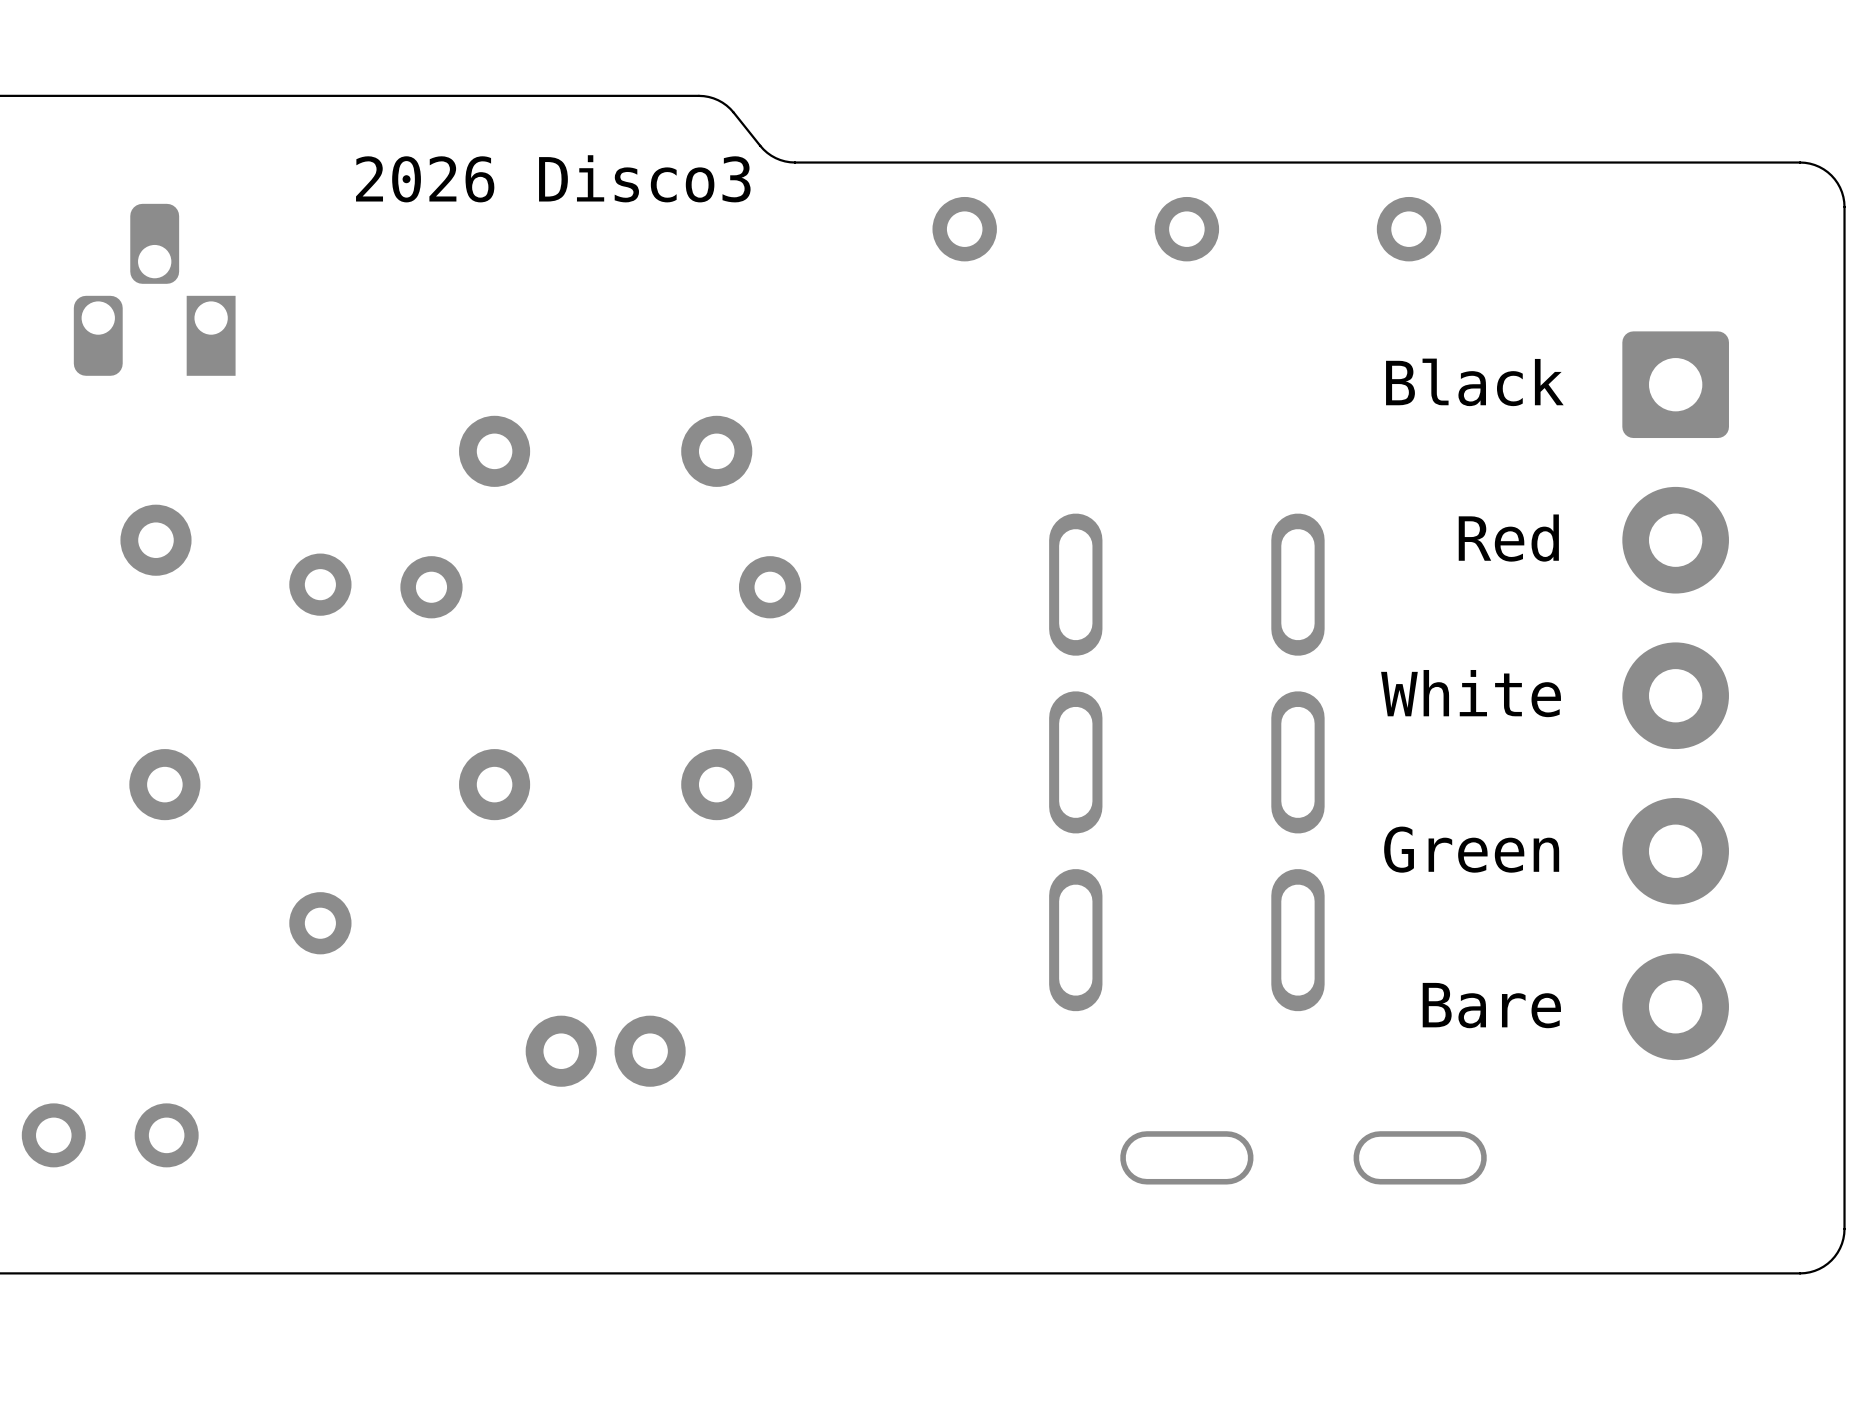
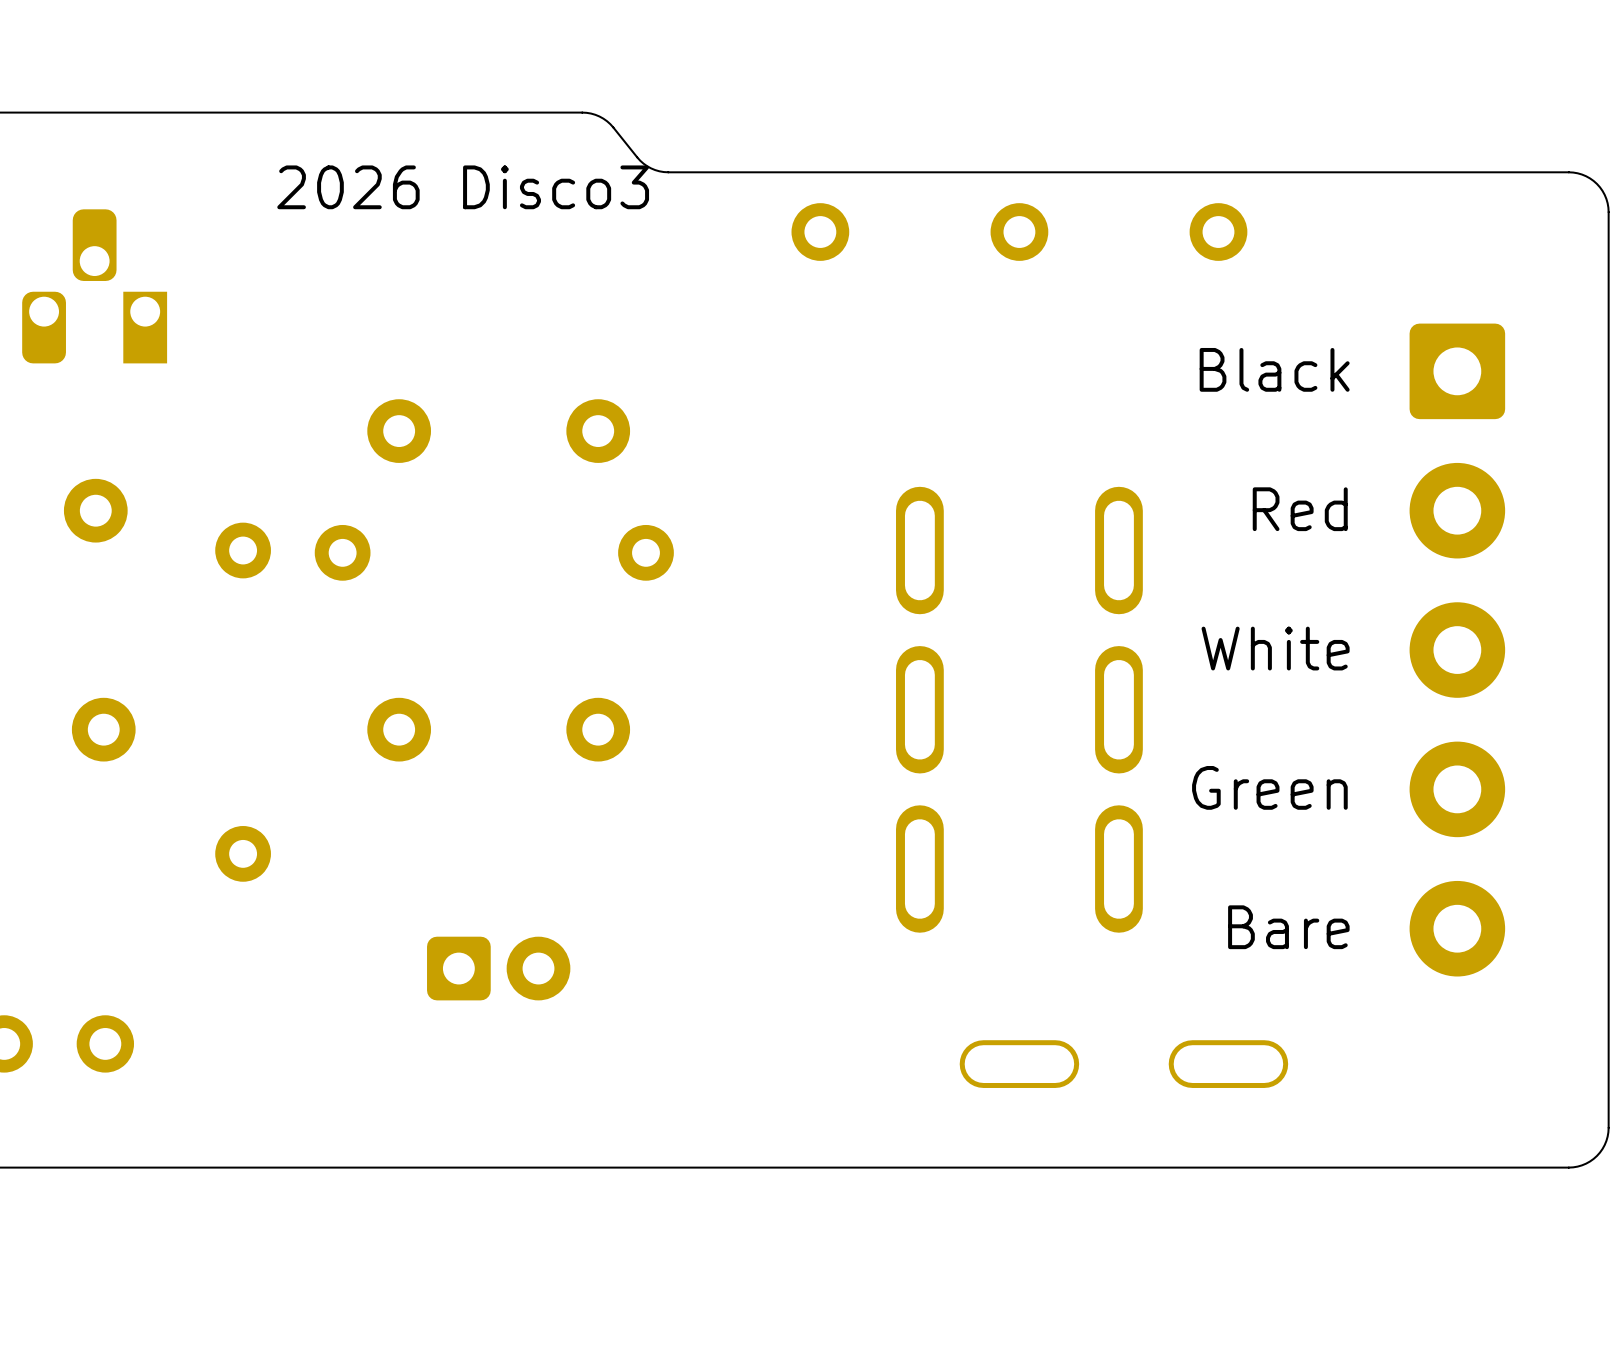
part footprint: [525, 1015, 686, 1087] -> [427, 936, 571, 1001]

